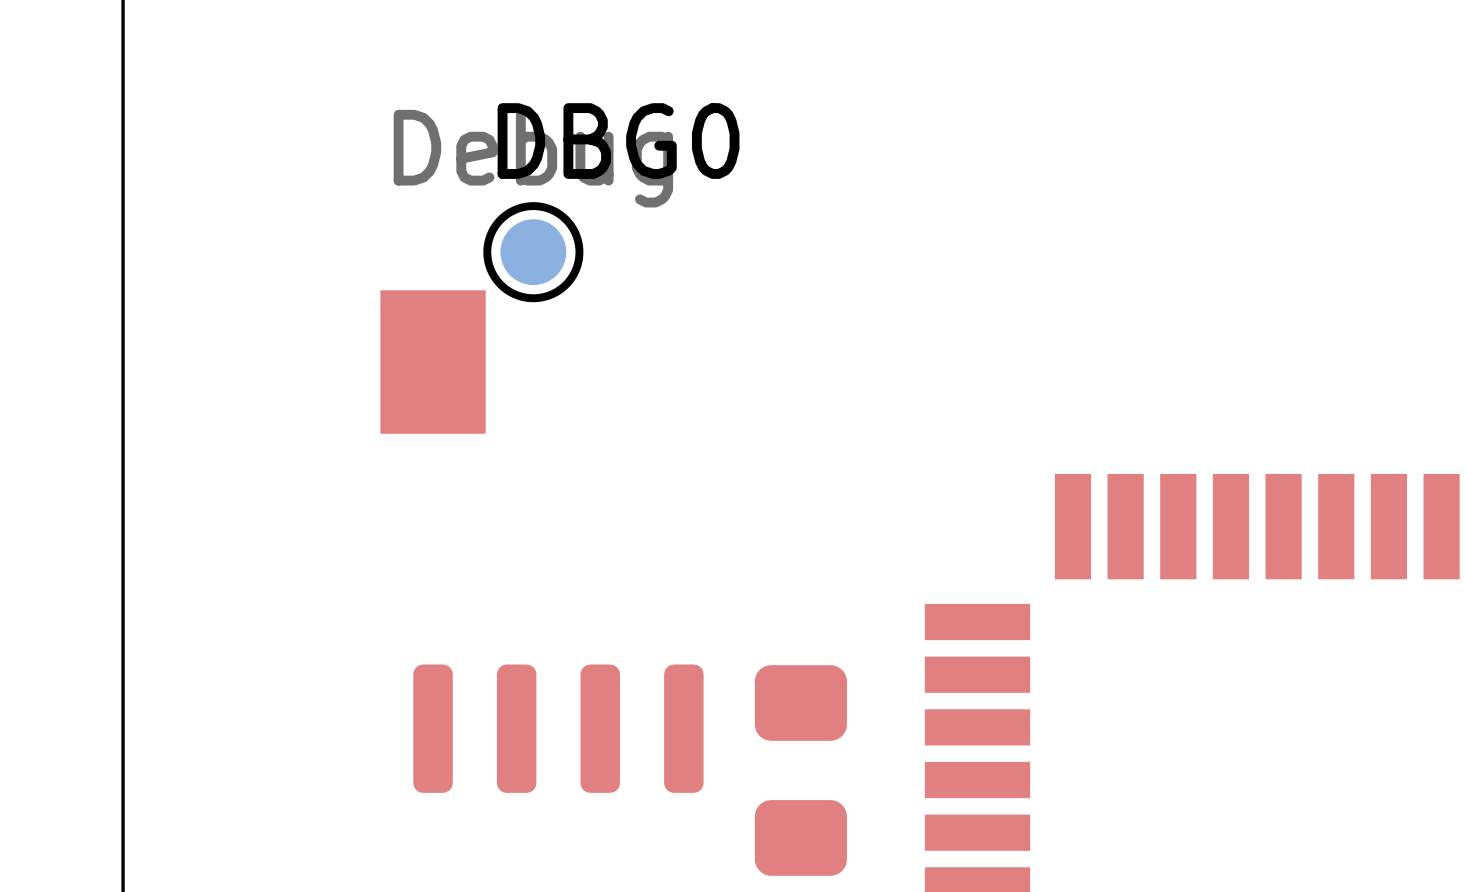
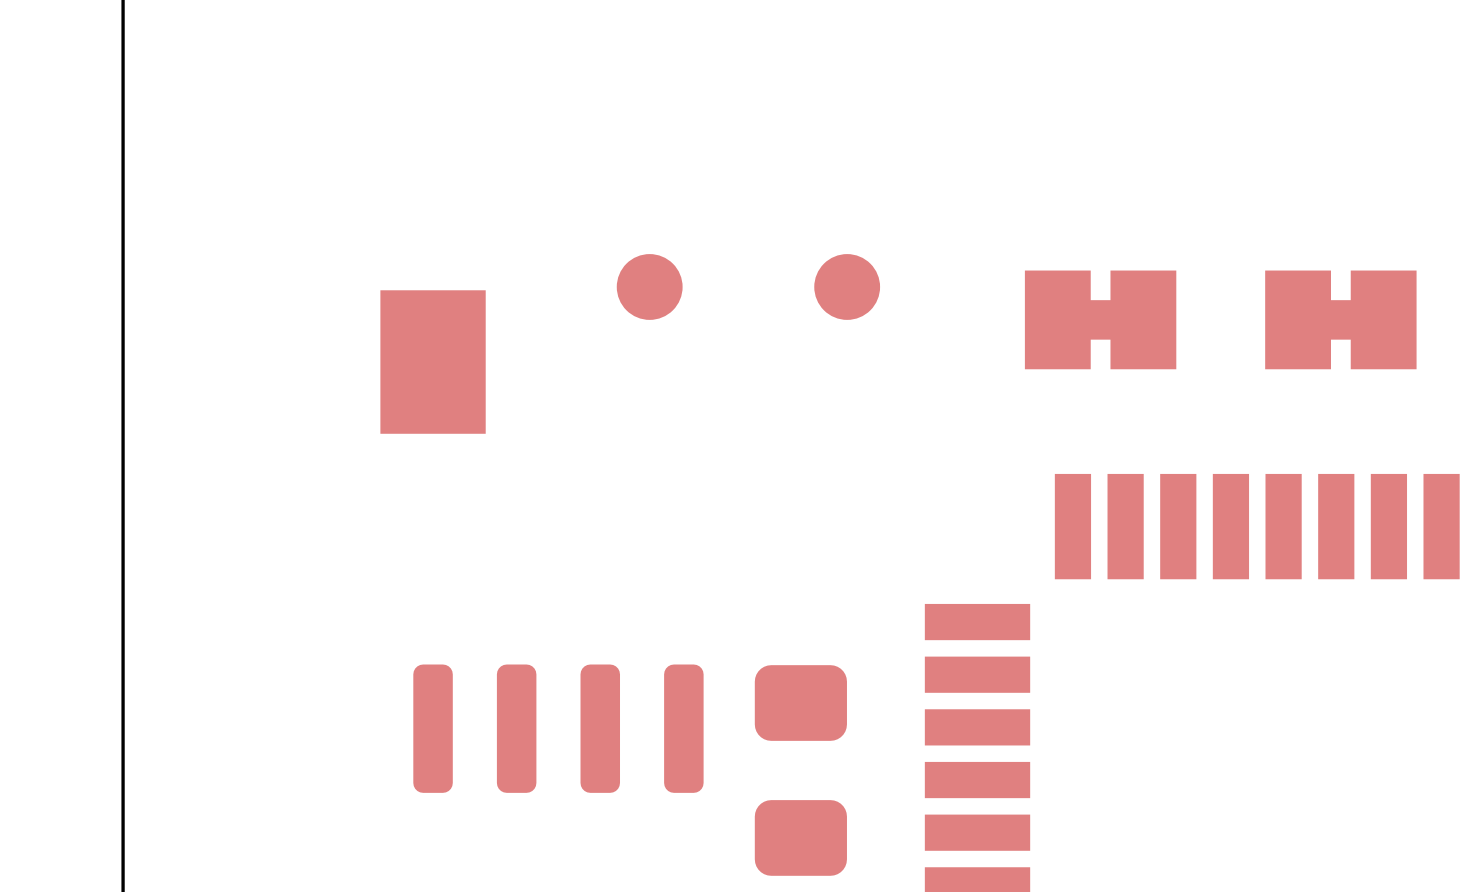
DBG0 side: bottom (533, 252) -> top (649, 286)
part: none -> (847, 286)
part: none -> (1100, 319)
part: none -> (1340, 319)

